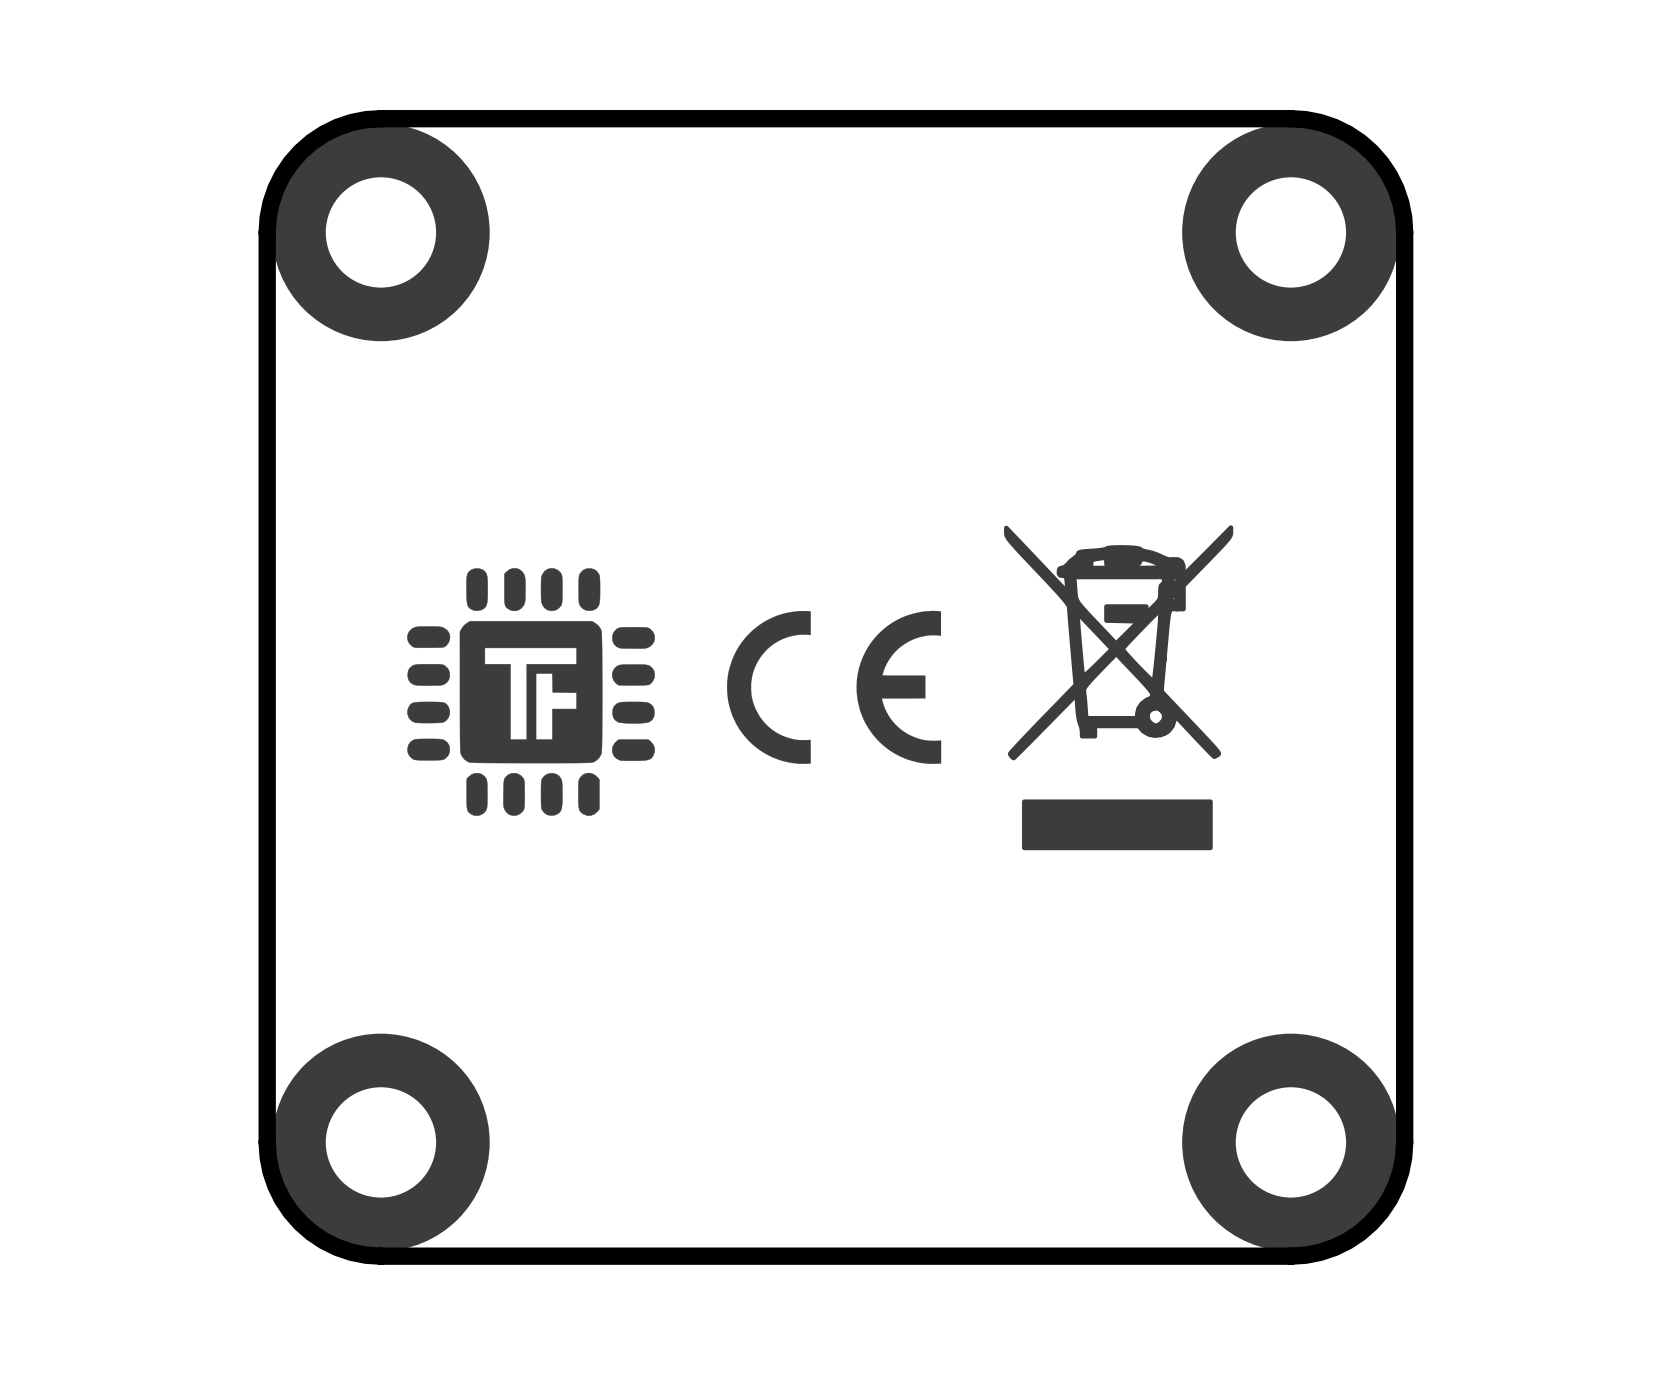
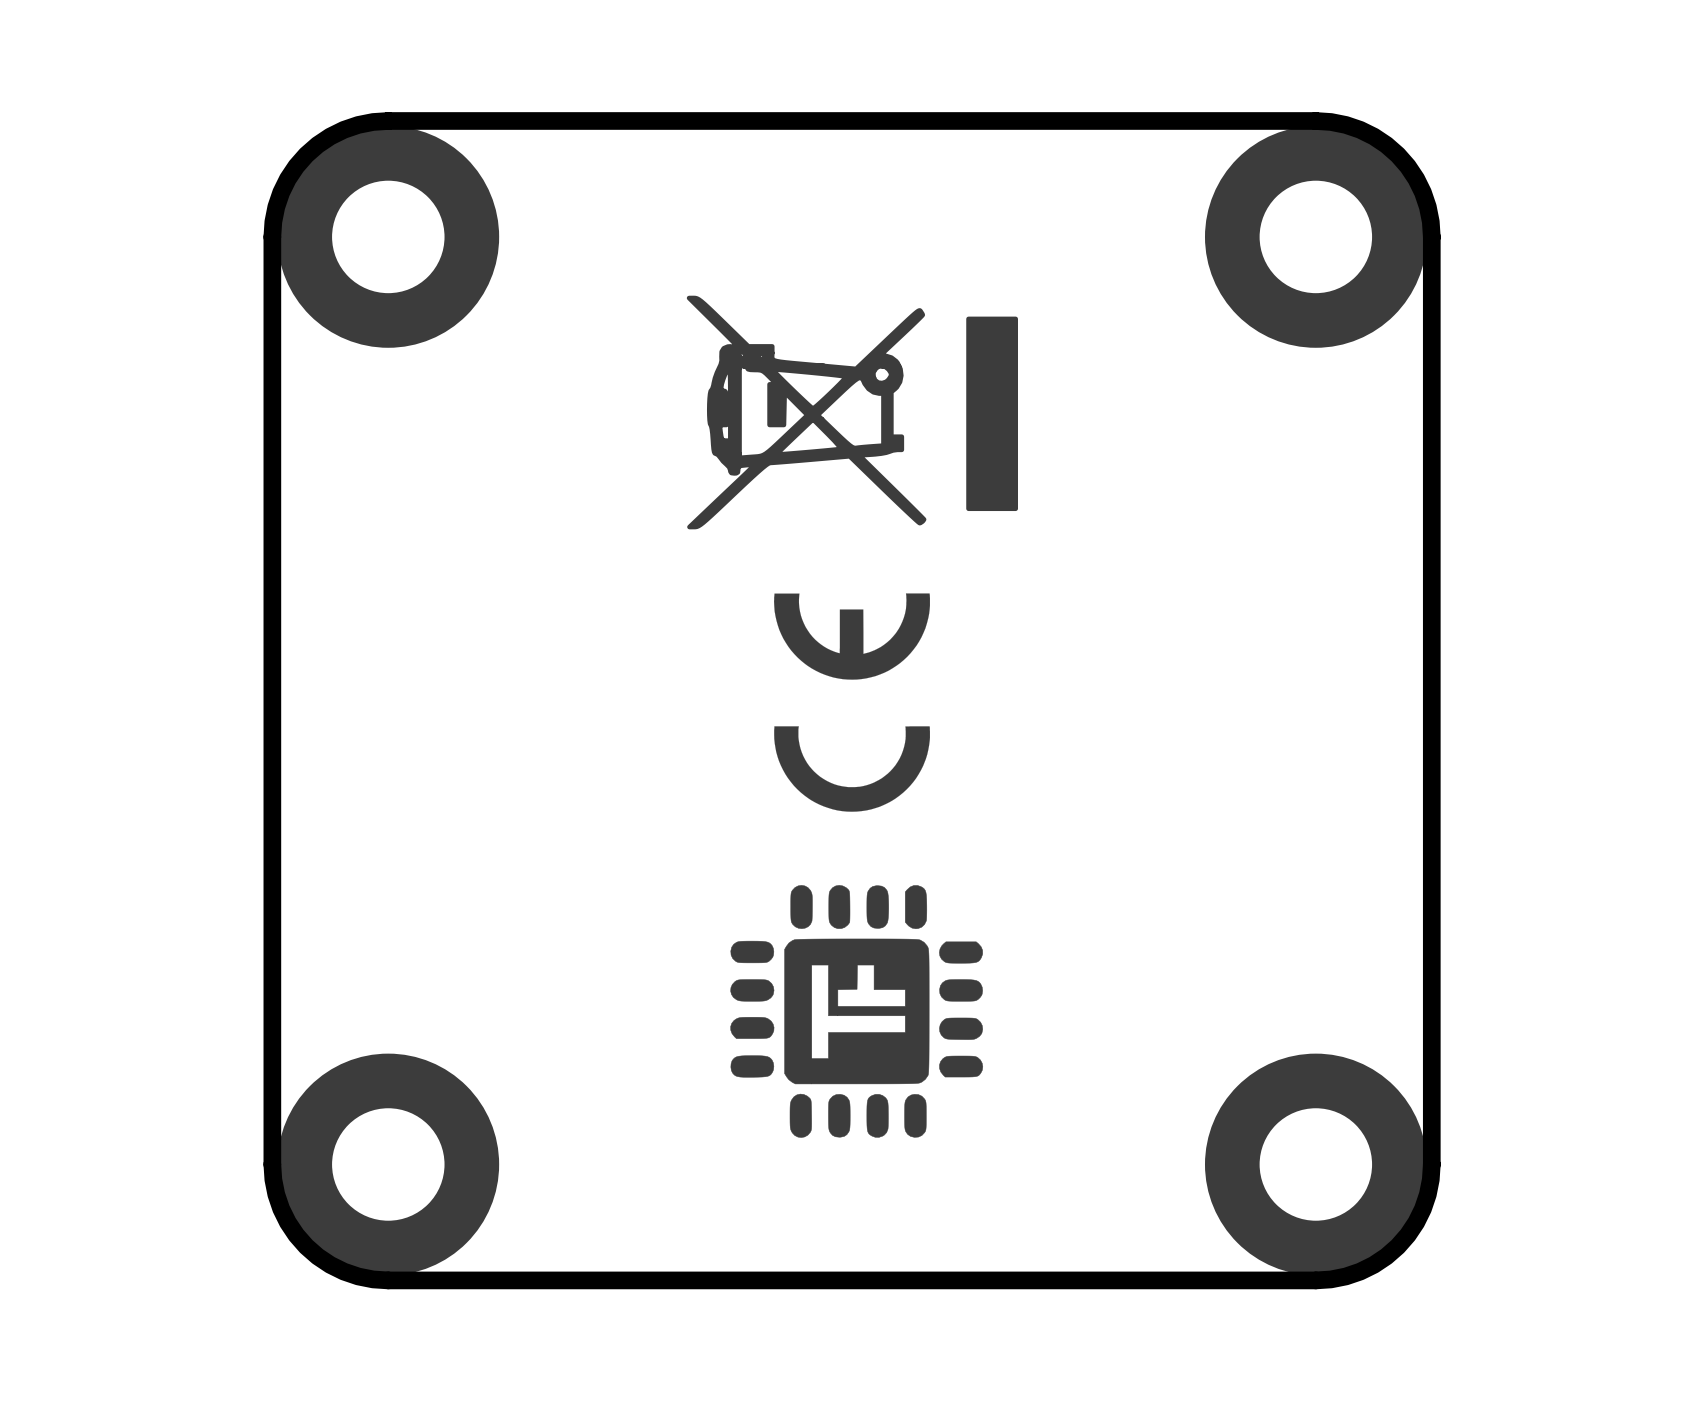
drawing: none -> [686, 295, 1019, 530]
drawing: [1004, 525, 1234, 851] -> none
drawing: [407, 568, 656, 816] -> none
drawing shape: [727, 610, 942, 764] -> [774, 593, 930, 812]
drawing: none -> [730, 885, 984, 1138]

